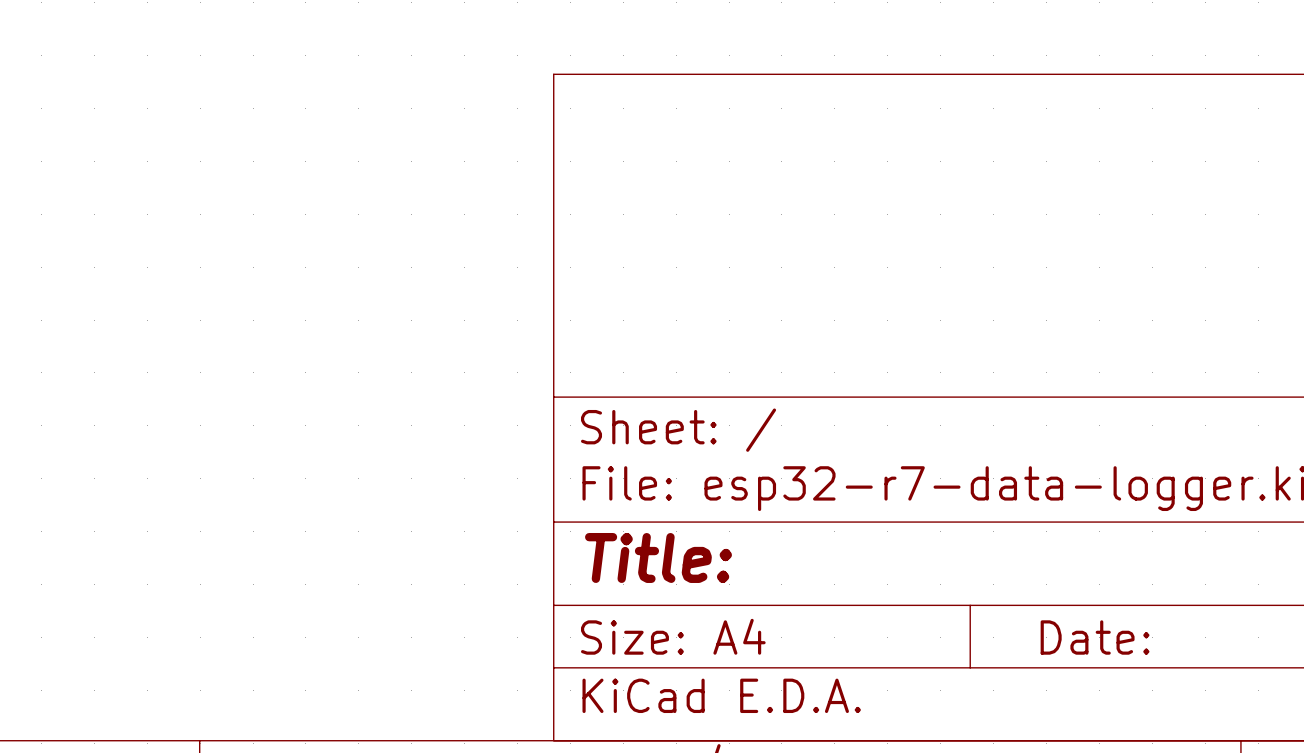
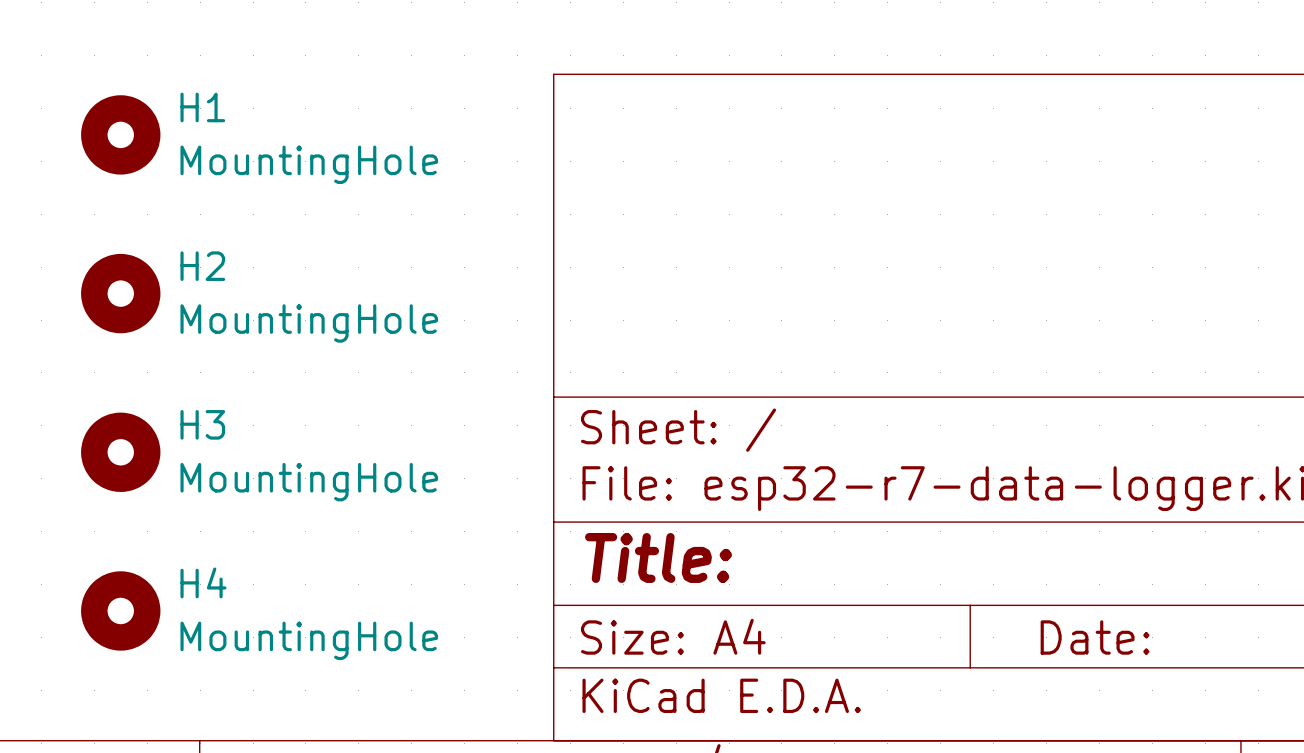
H1: none -> MountingHole (120, 134)
H2: none -> MountingHole (120, 293)
H3: none -> MountingHole (120, 452)
H4: none -> MountingHole (120, 610)

